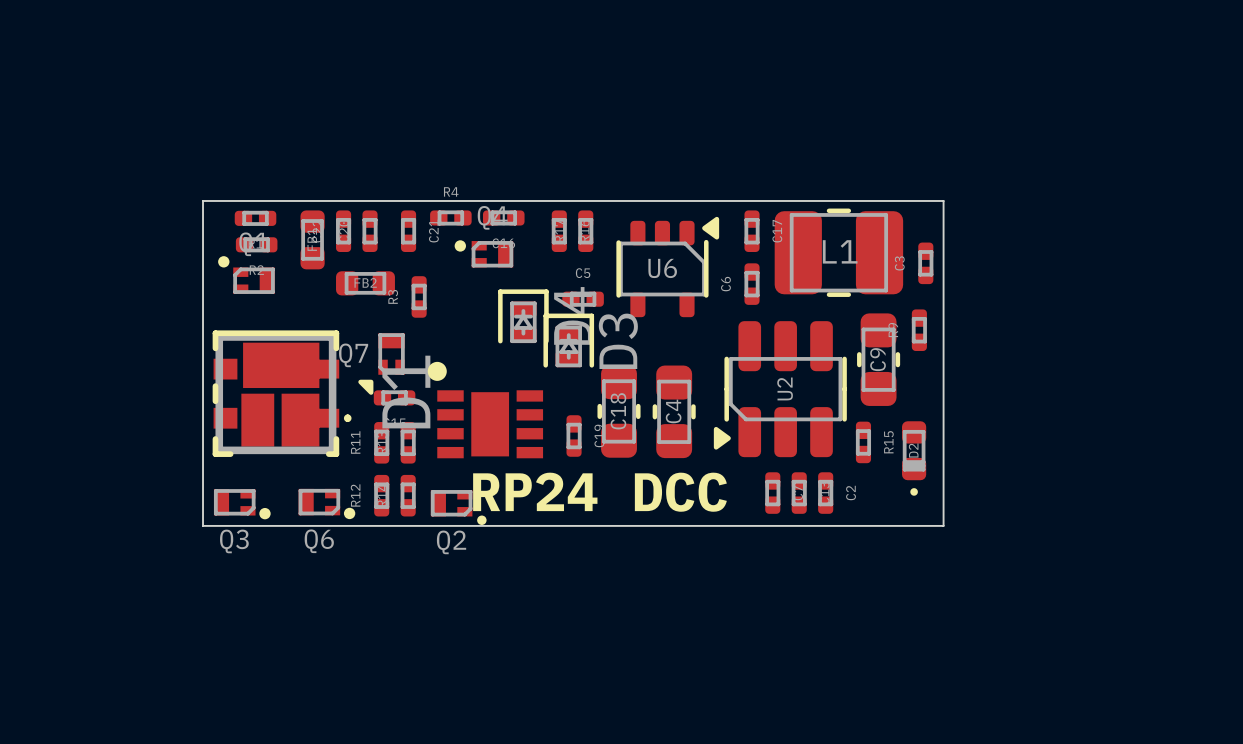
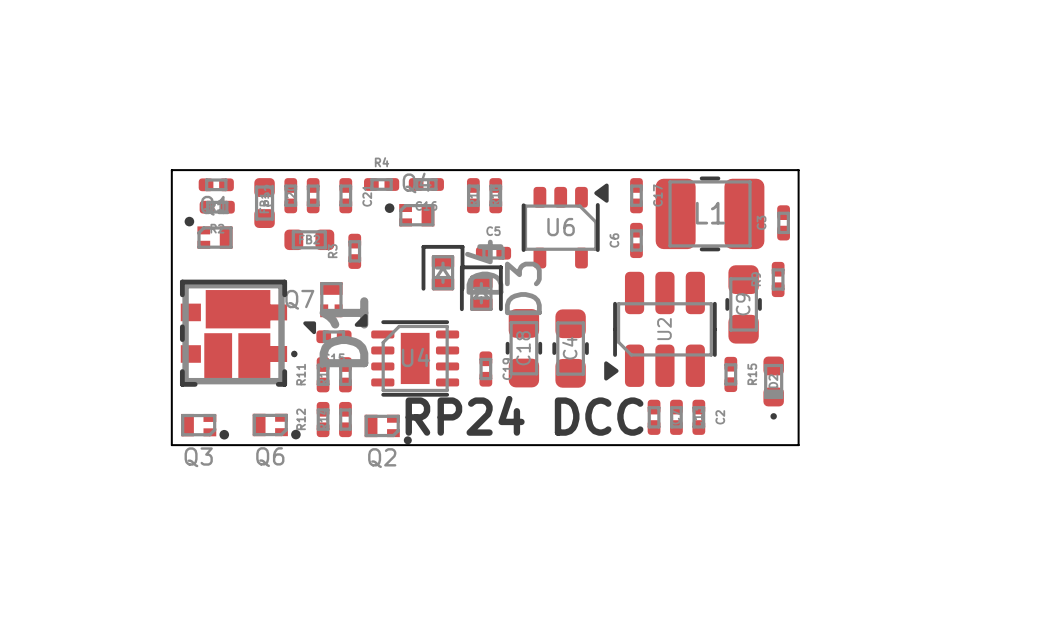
part: (485, 410) -> none
part: none -> (406, 355)

